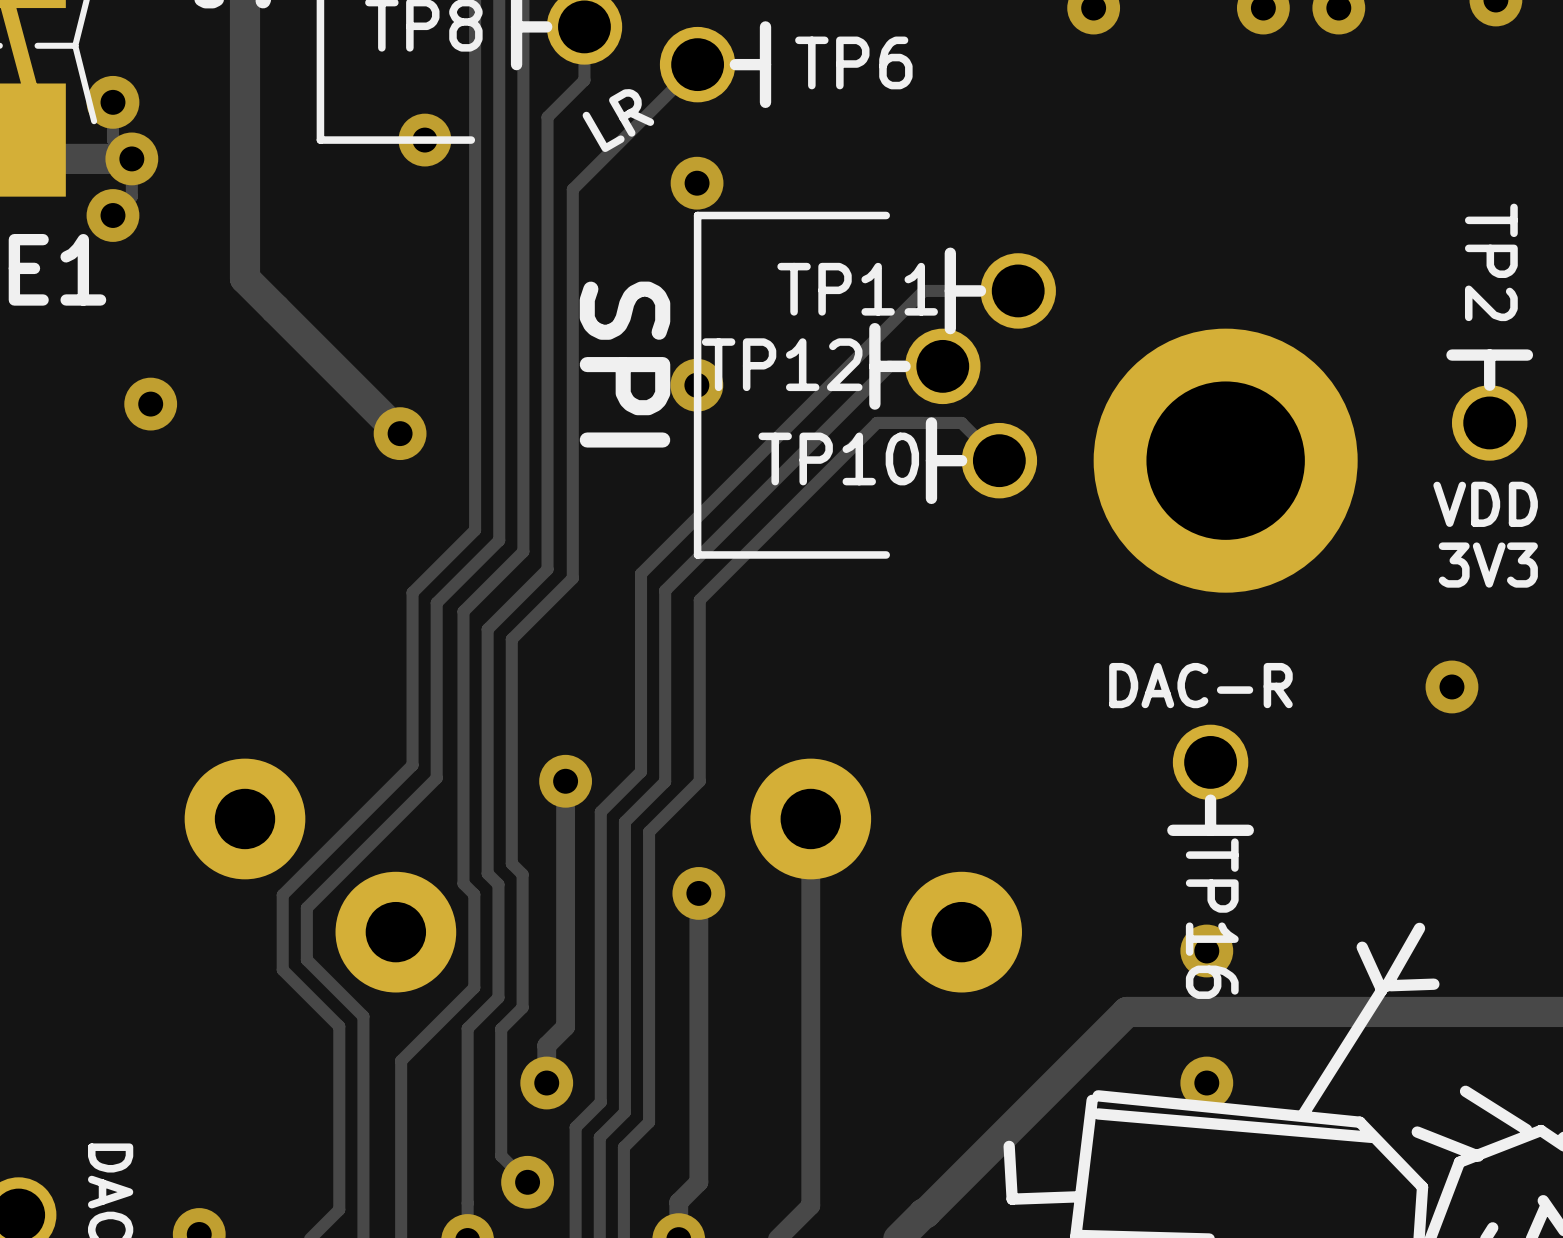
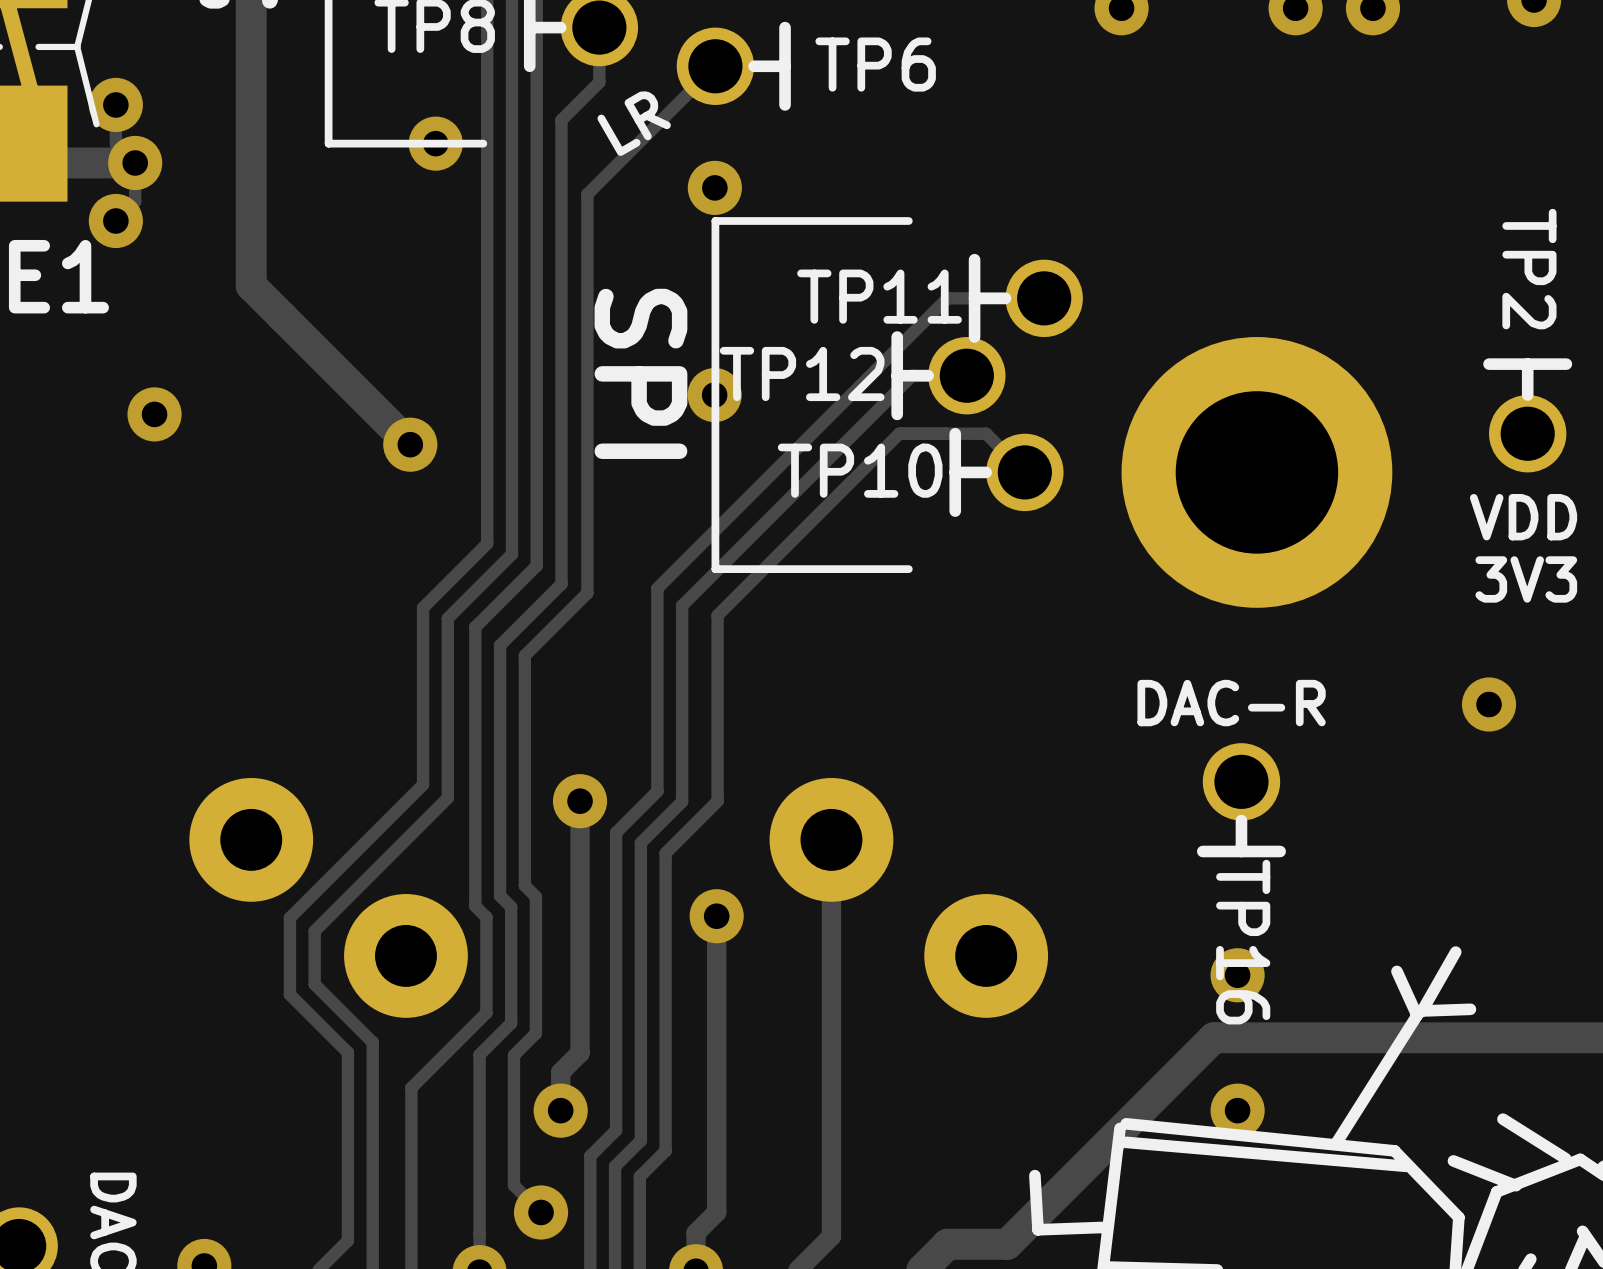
track: (1183, 1011) (1126, 1011) (925, 1213) -> (1213, 1037) (1007, 1244) (949, 1244)

